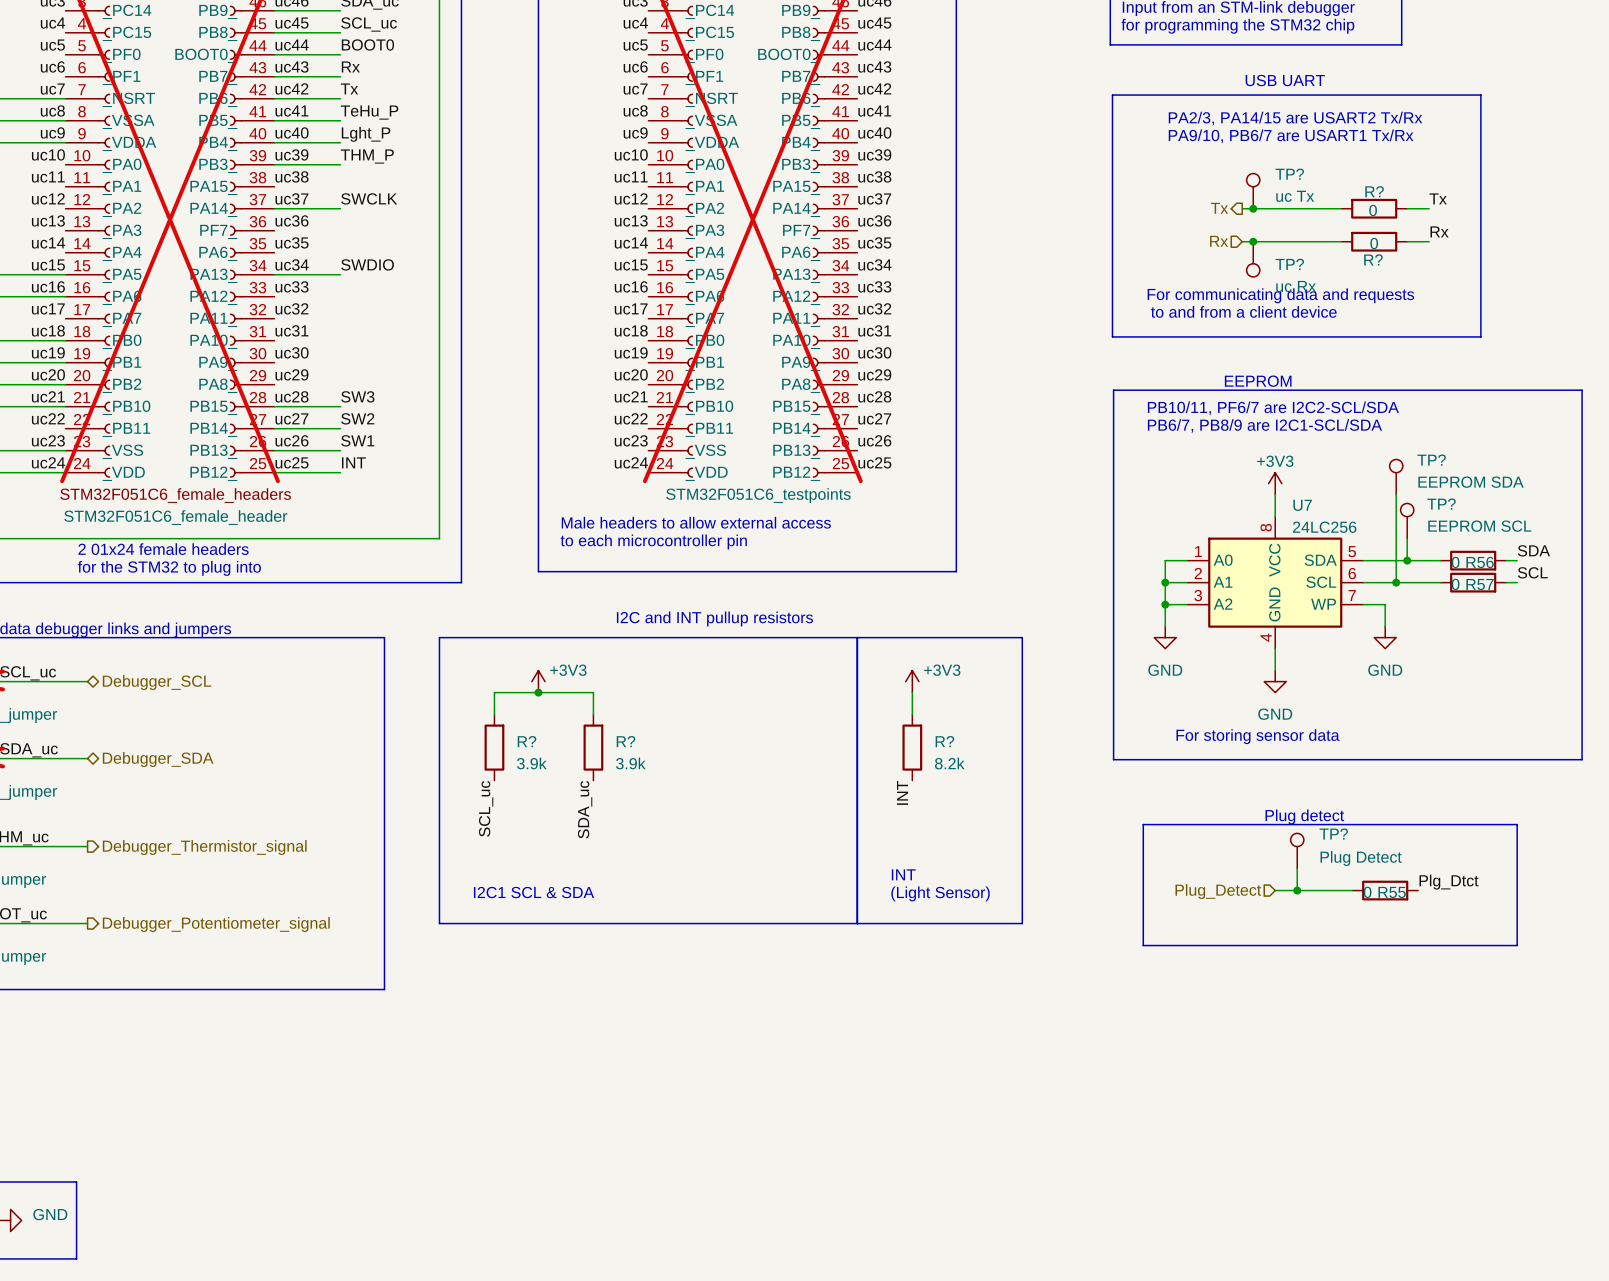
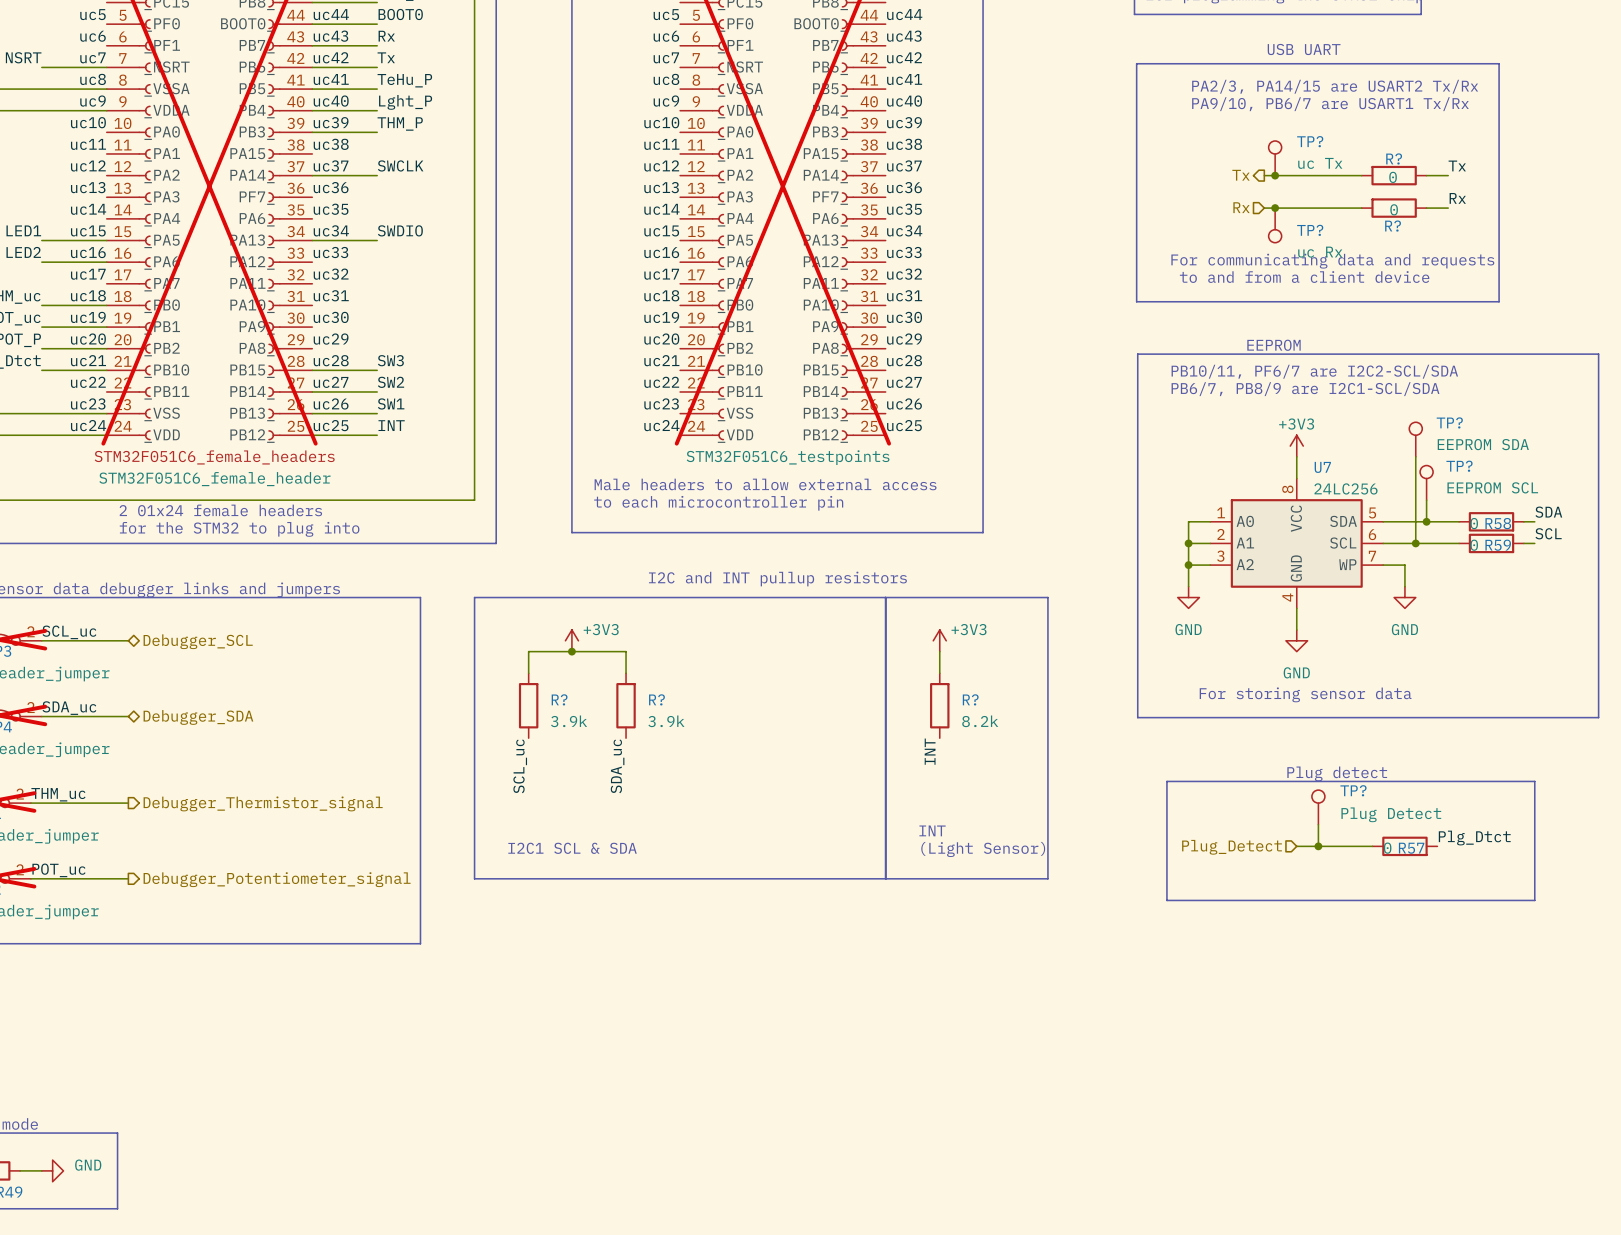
R56 name: R56 (1480, 562) -> R58 (1498, 523)
R57 name: R57 (1480, 584) -> R59 (1498, 545)
R55 name: R55 (1392, 892) -> R57 (1411, 848)

